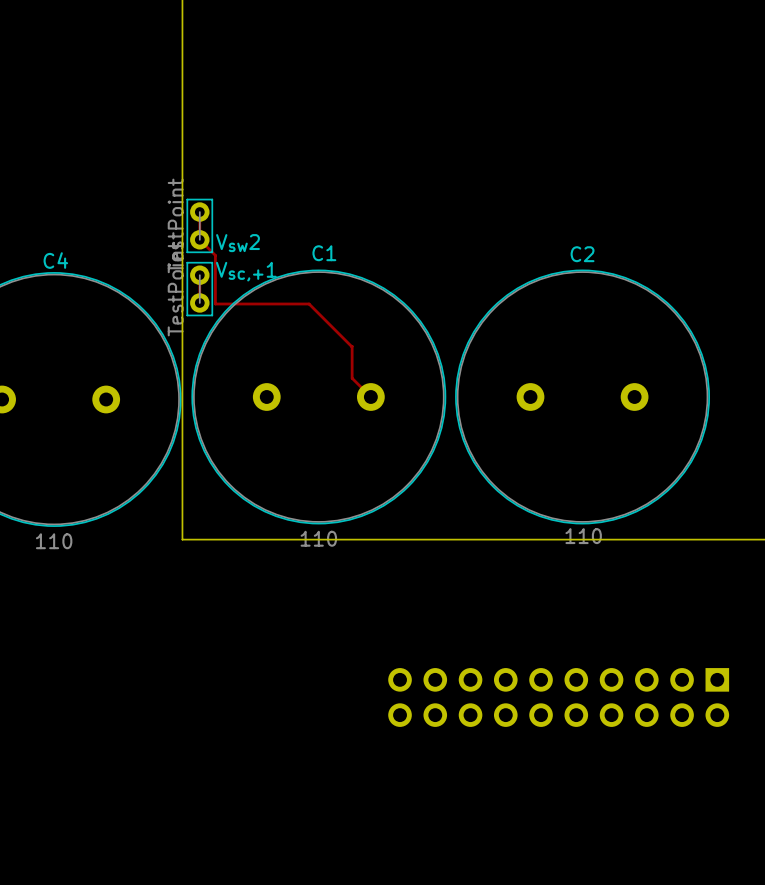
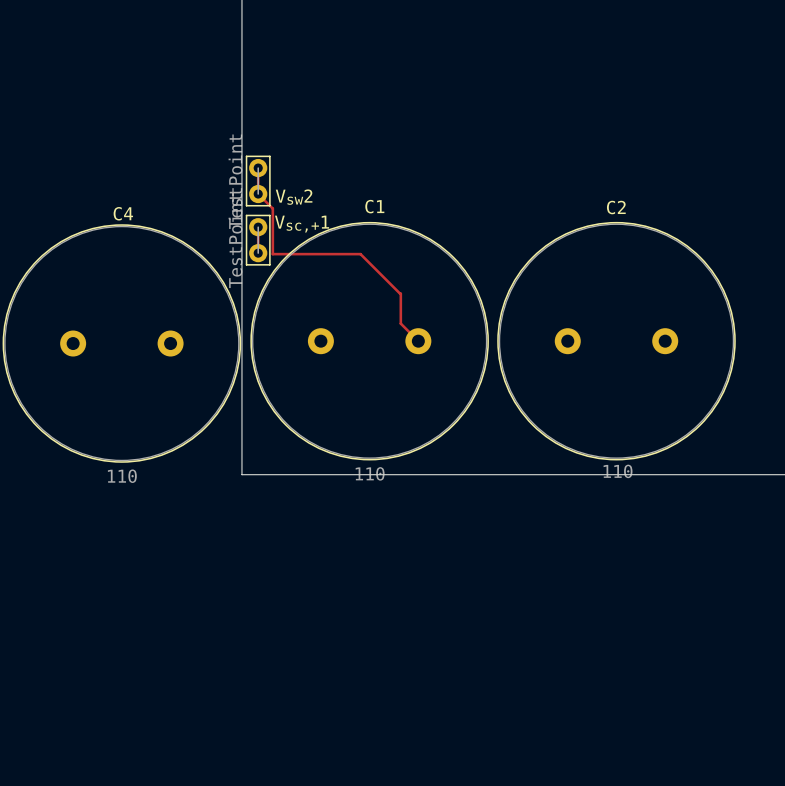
part: (558, 697) -> none

